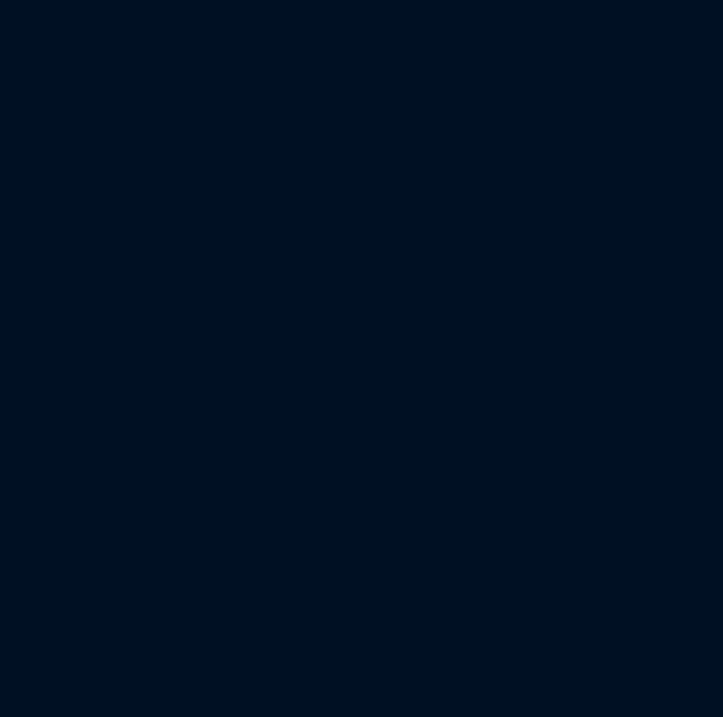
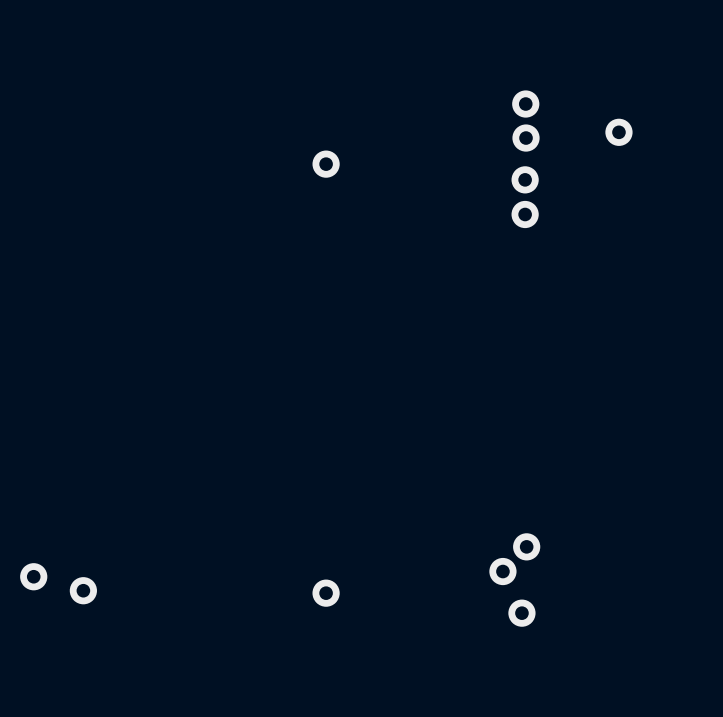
via: none -> (525, 104)
via: none -> (618, 132)
via: none -> (526, 138)
via: none -> (326, 164)
via: none -> (525, 179)
via: none -> (525, 214)
via: none -> (526, 546)
via: none -> (502, 571)
via: none -> (33, 576)
via: none -> (83, 590)
via: none -> (326, 593)
via: none -> (521, 613)

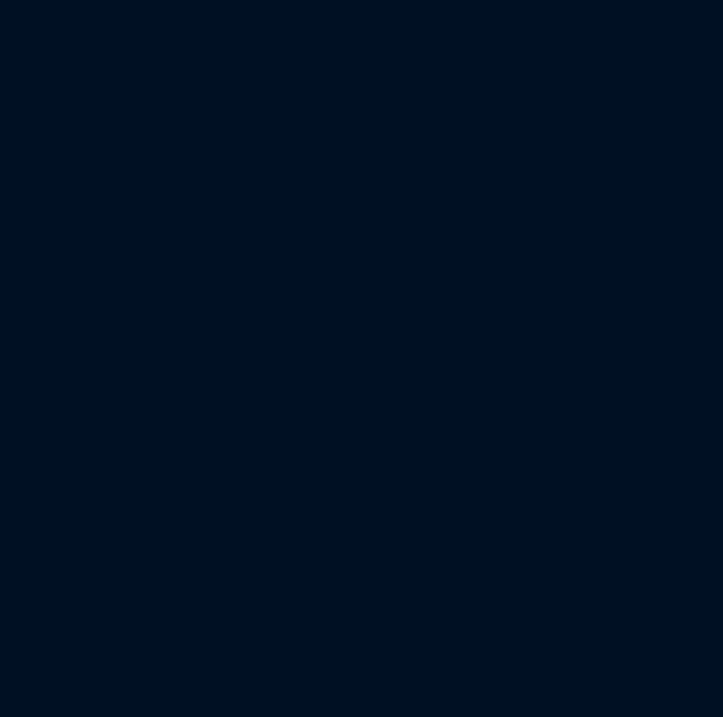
via: (525, 104) -> none
via: (618, 132) -> none
via: (526, 138) -> none
via: (326, 164) -> none
via: (525, 179) -> none
via: (525, 214) -> none
via: (526, 546) -> none
via: (502, 571) -> none
via: (33, 576) -> none
via: (83, 590) -> none
via: (326, 593) -> none
via: (521, 613) -> none

